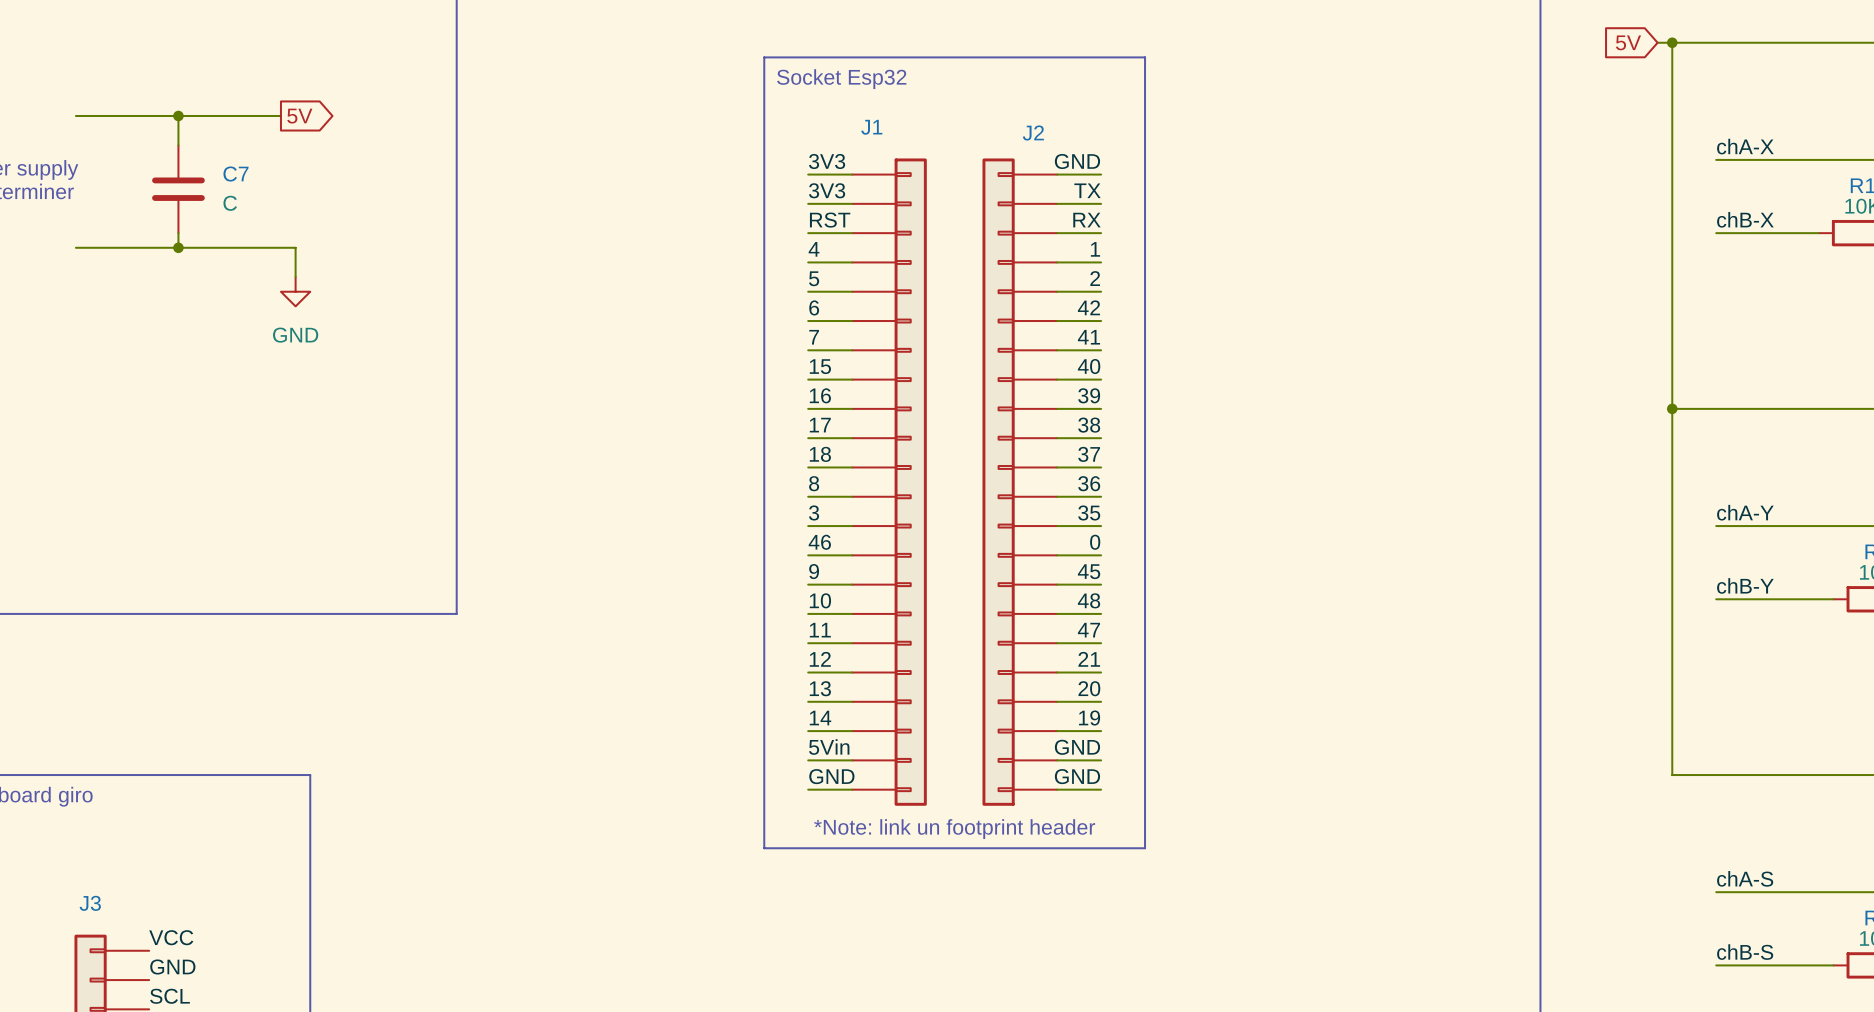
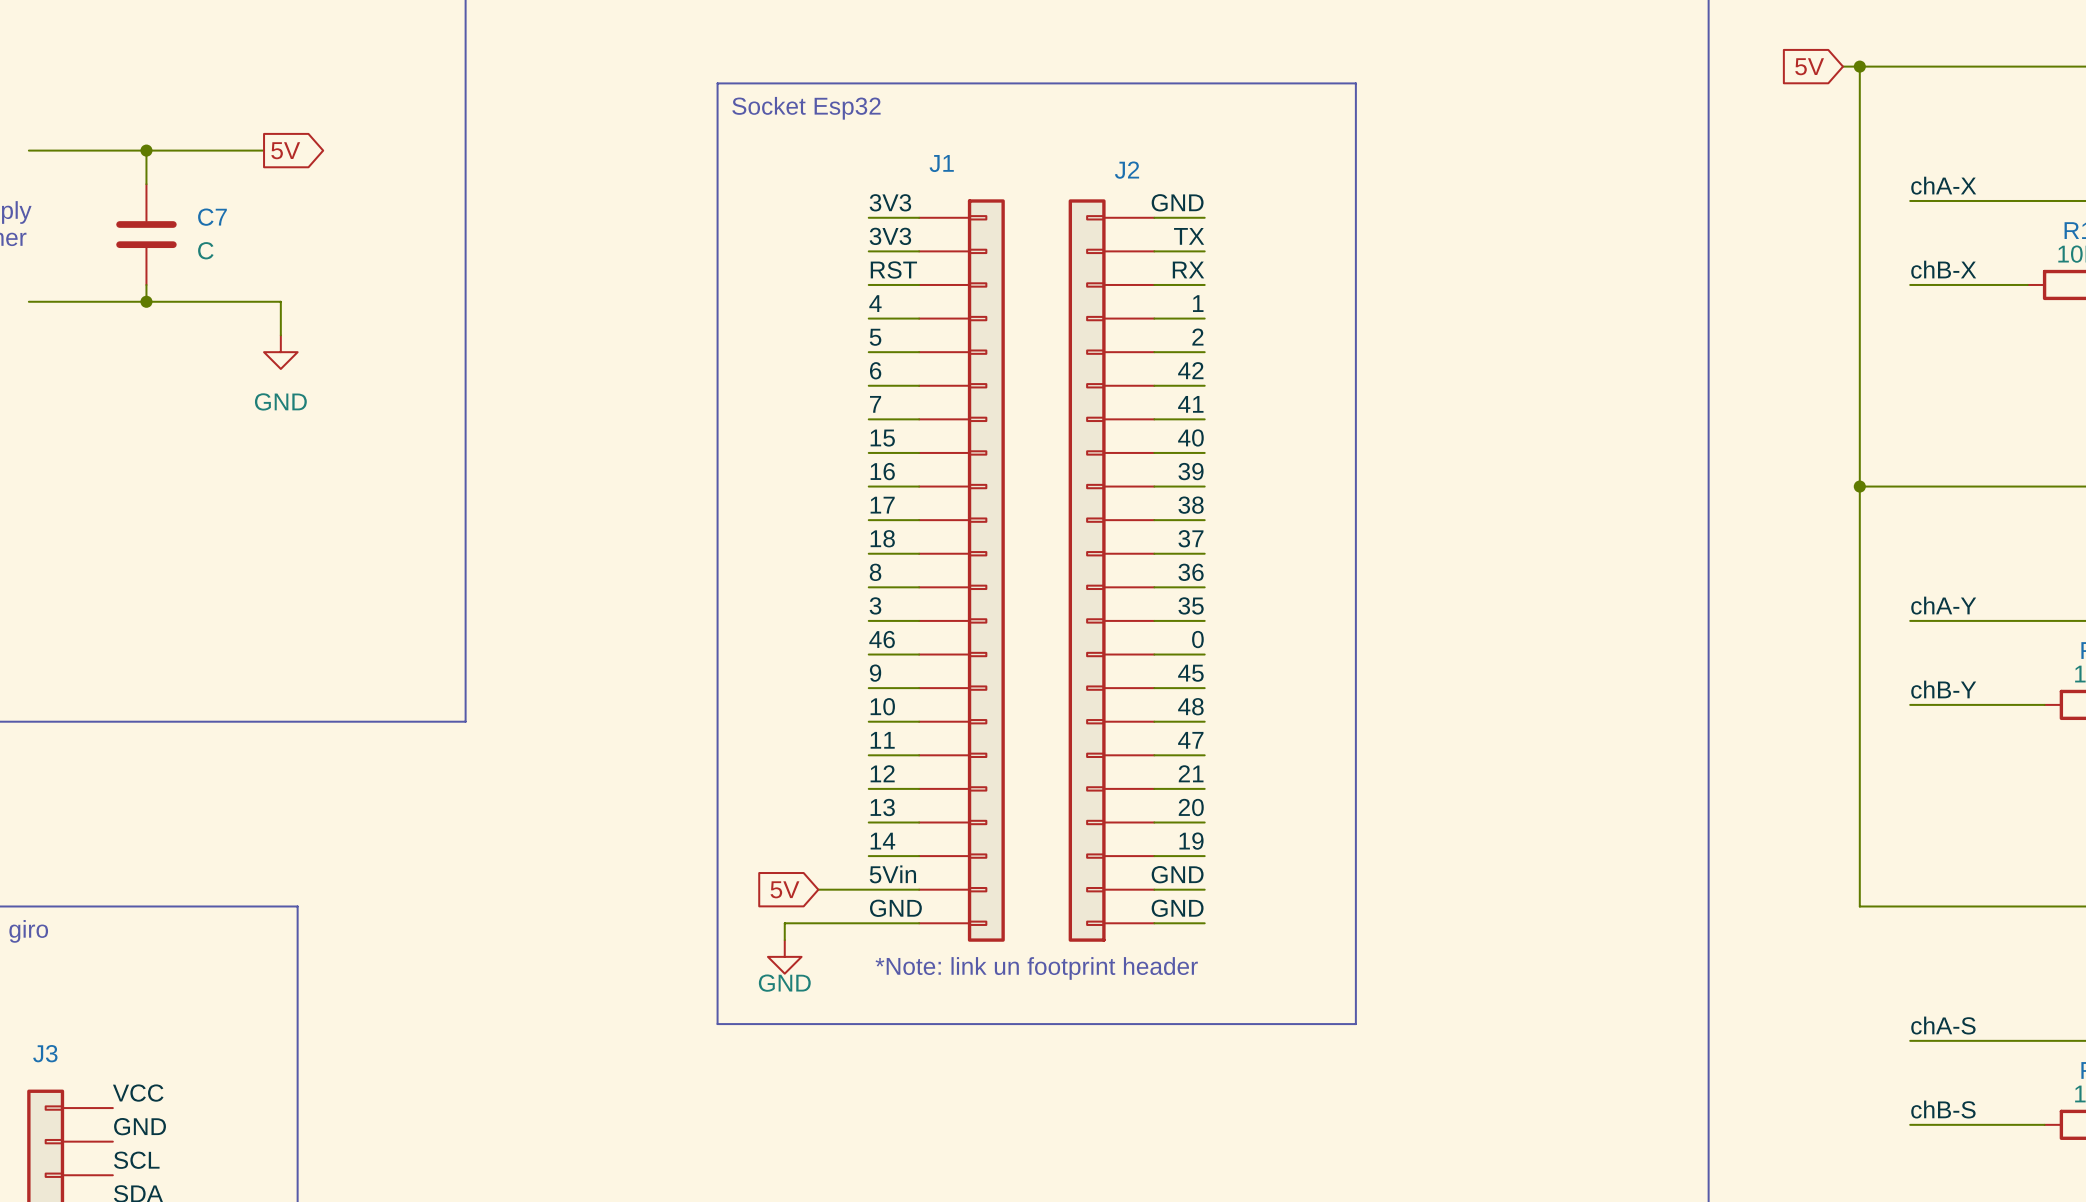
line: (764, 57) (764, 848) (1145, 848) (1145, 57) -> (818, 83) (717, 83) (717, 1024) (1355, 1024) (1355, 83) (1255, 83)
text position: Socket Esp32 (841, 79) -> Socket Esp32 (806, 108)
global label: none -> 5V (784, 889)
wire: none -> (818, 889) (868, 889)
wire: none -> (868, 923) (784, 923) (784, 940)
power symbol: none -> GND (784, 956)

